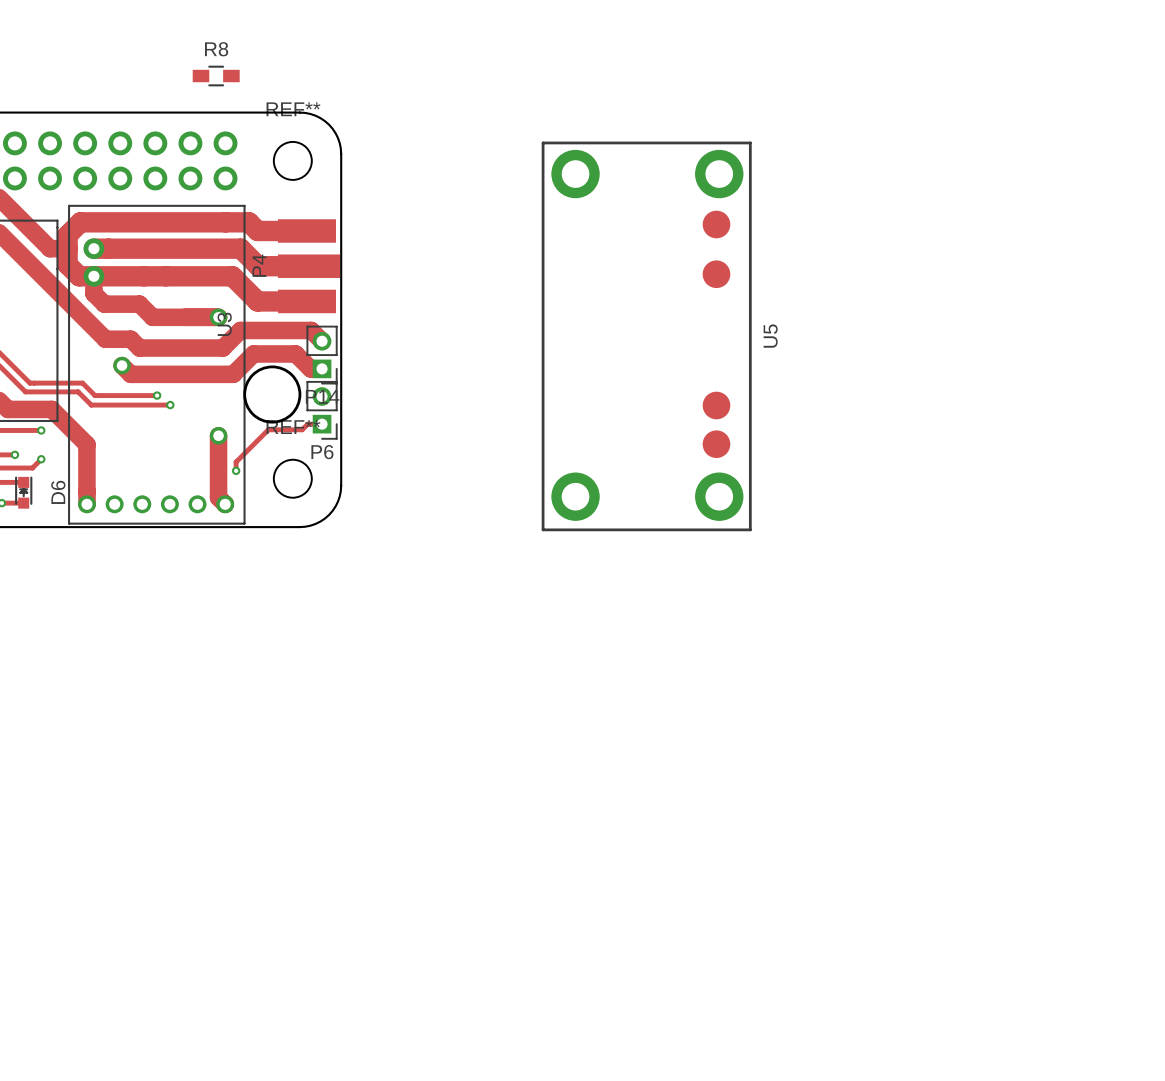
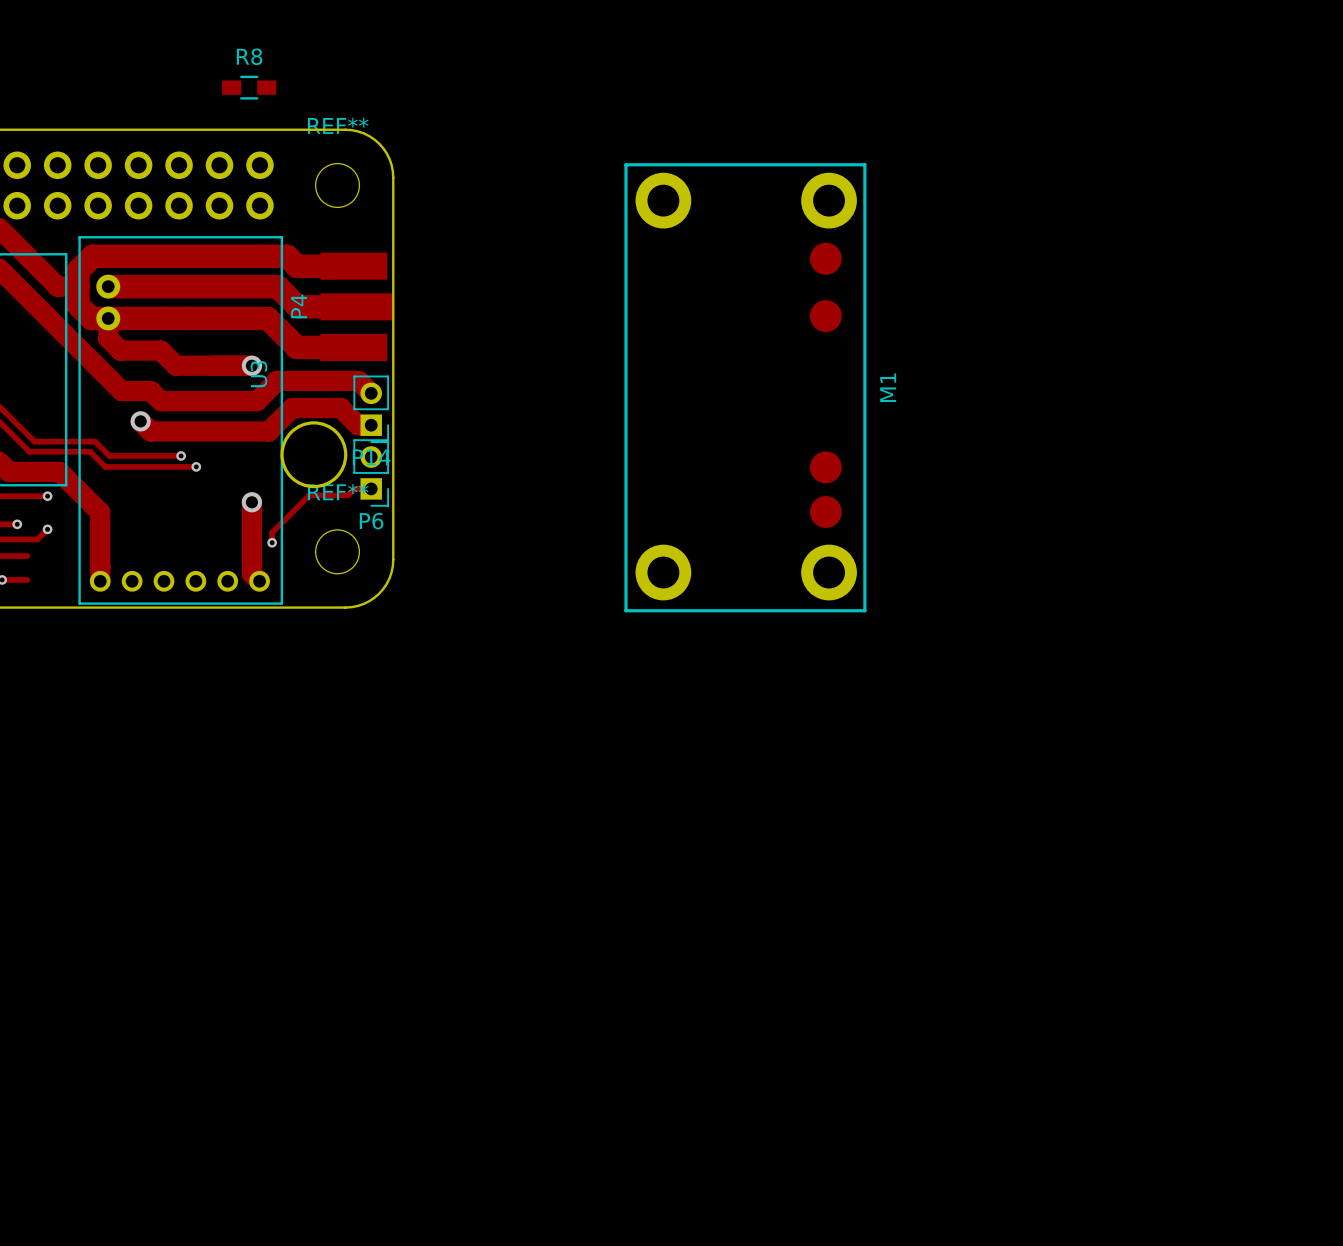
U5 name: U5 (770, 336) -> M1 (888, 387)
D6: (23, 492) -> none

